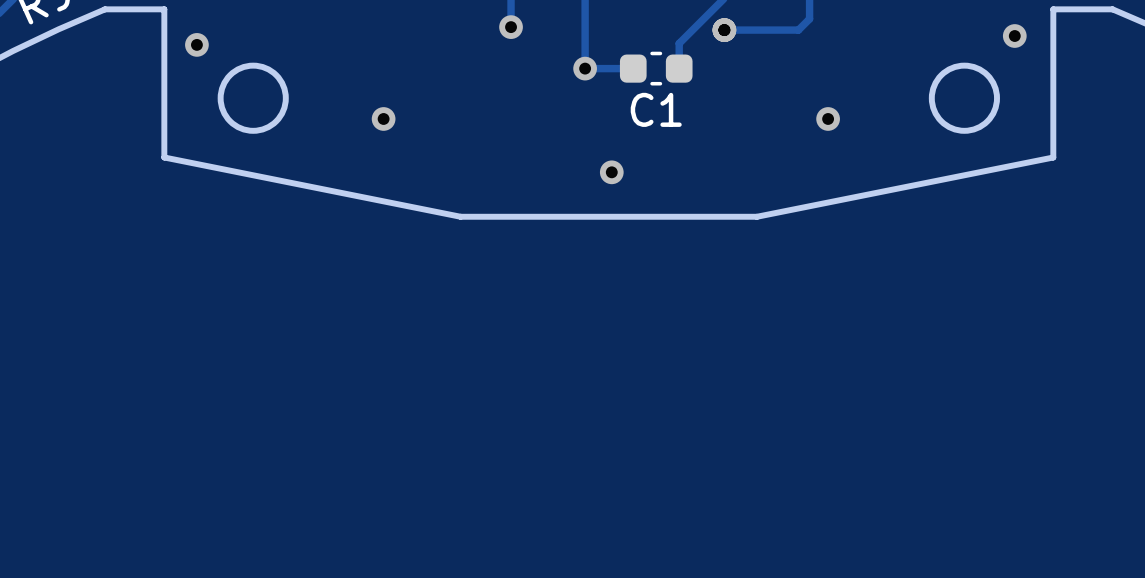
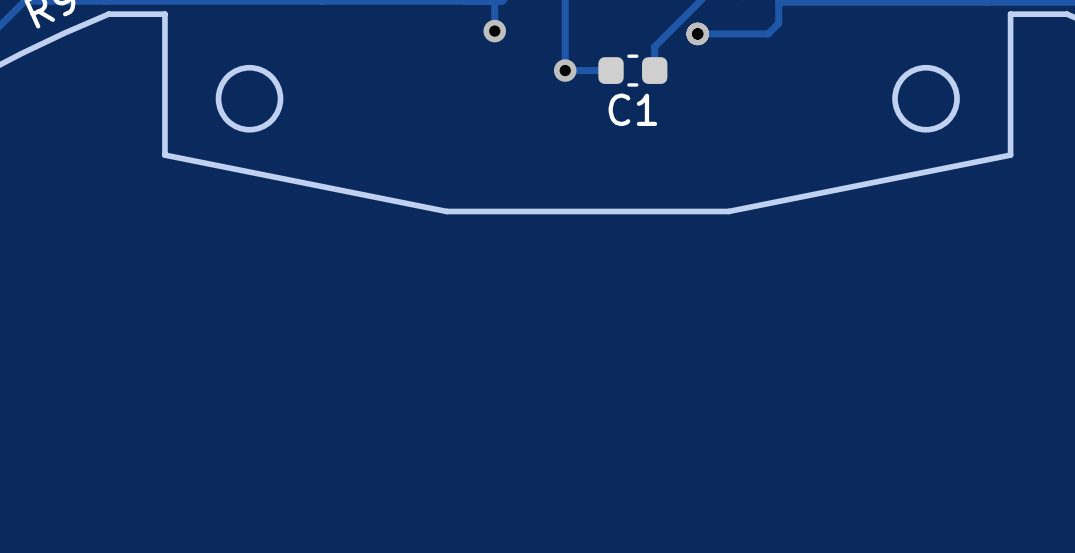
via: (1014, 36) -> none
via: (196, 44) -> none
via: (383, 118) -> none
via: (828, 118) -> none
via: (611, 172) -> none

